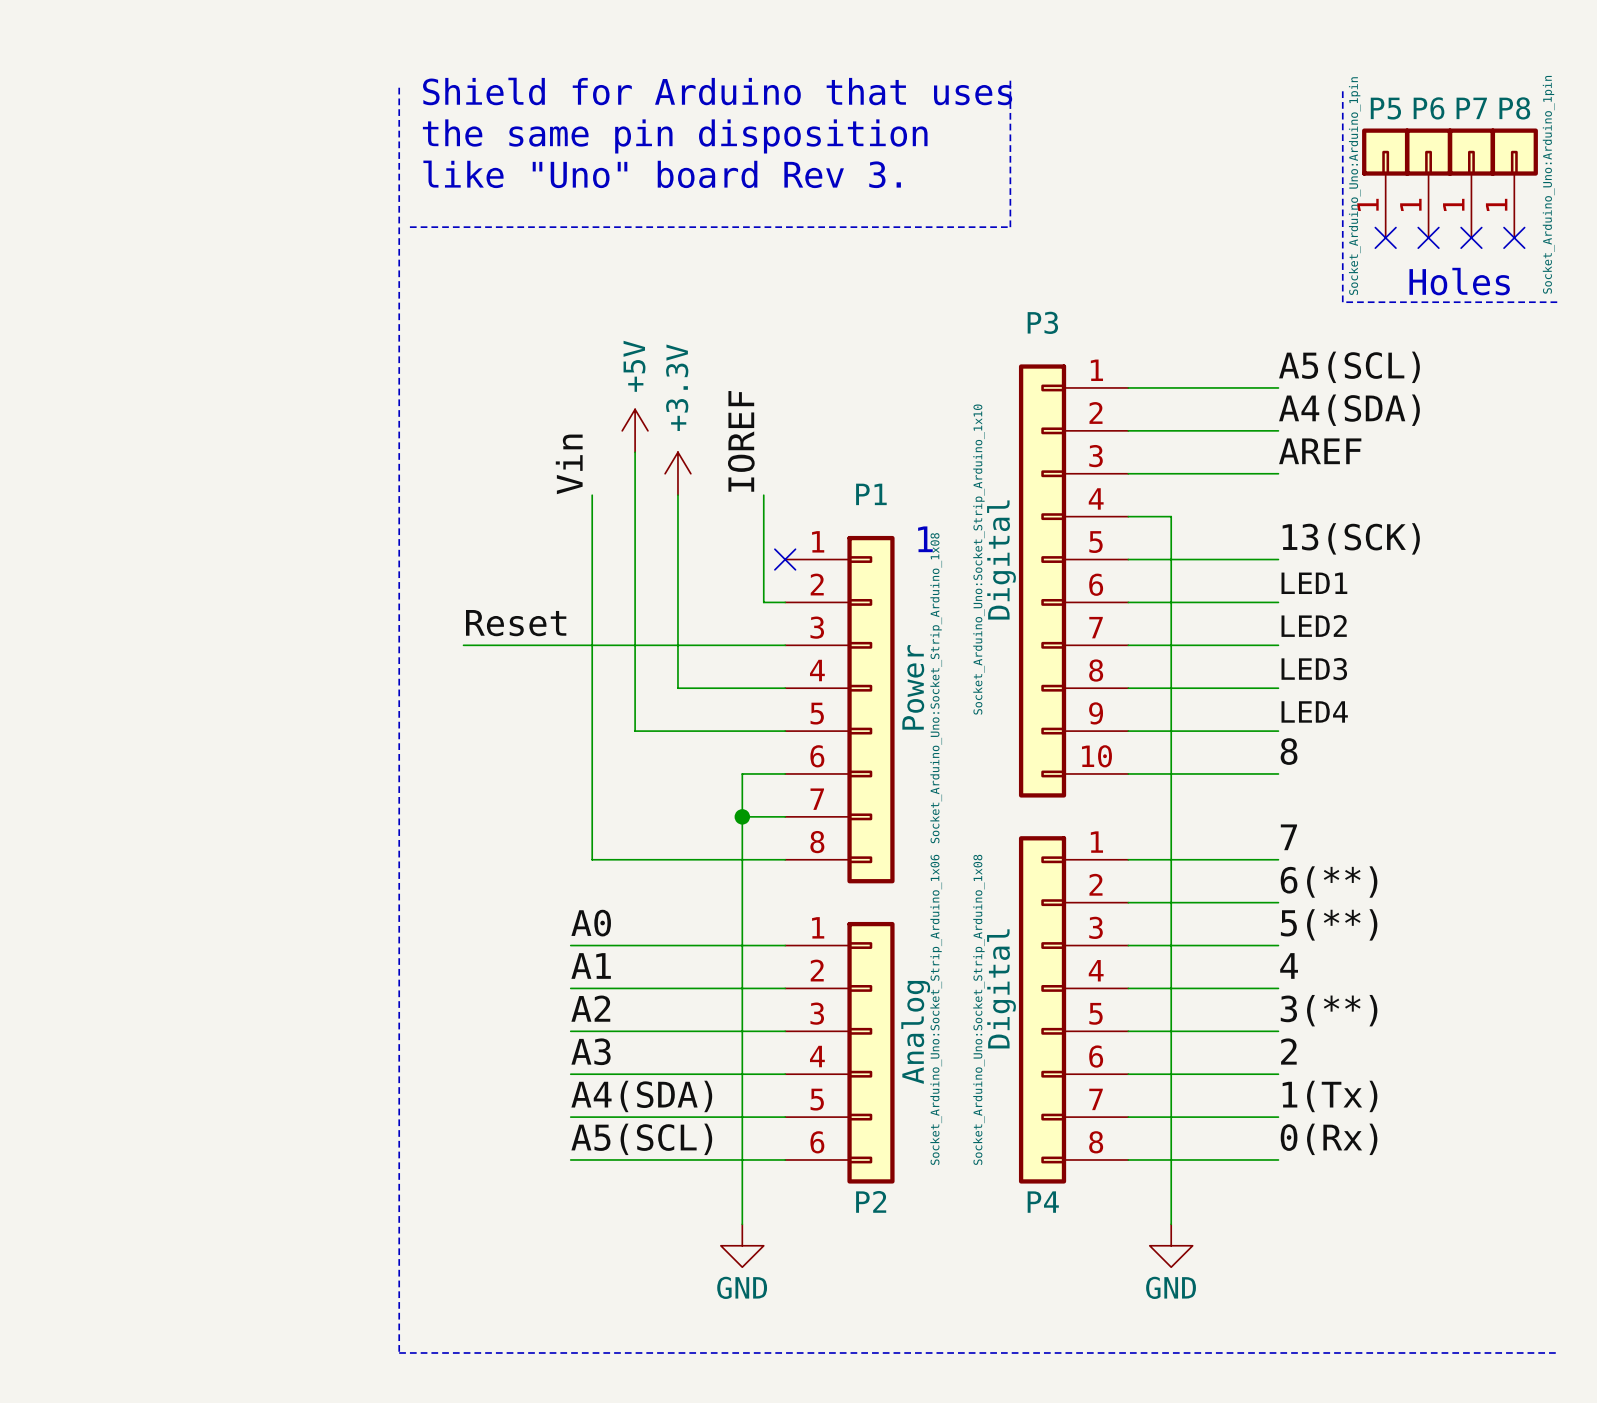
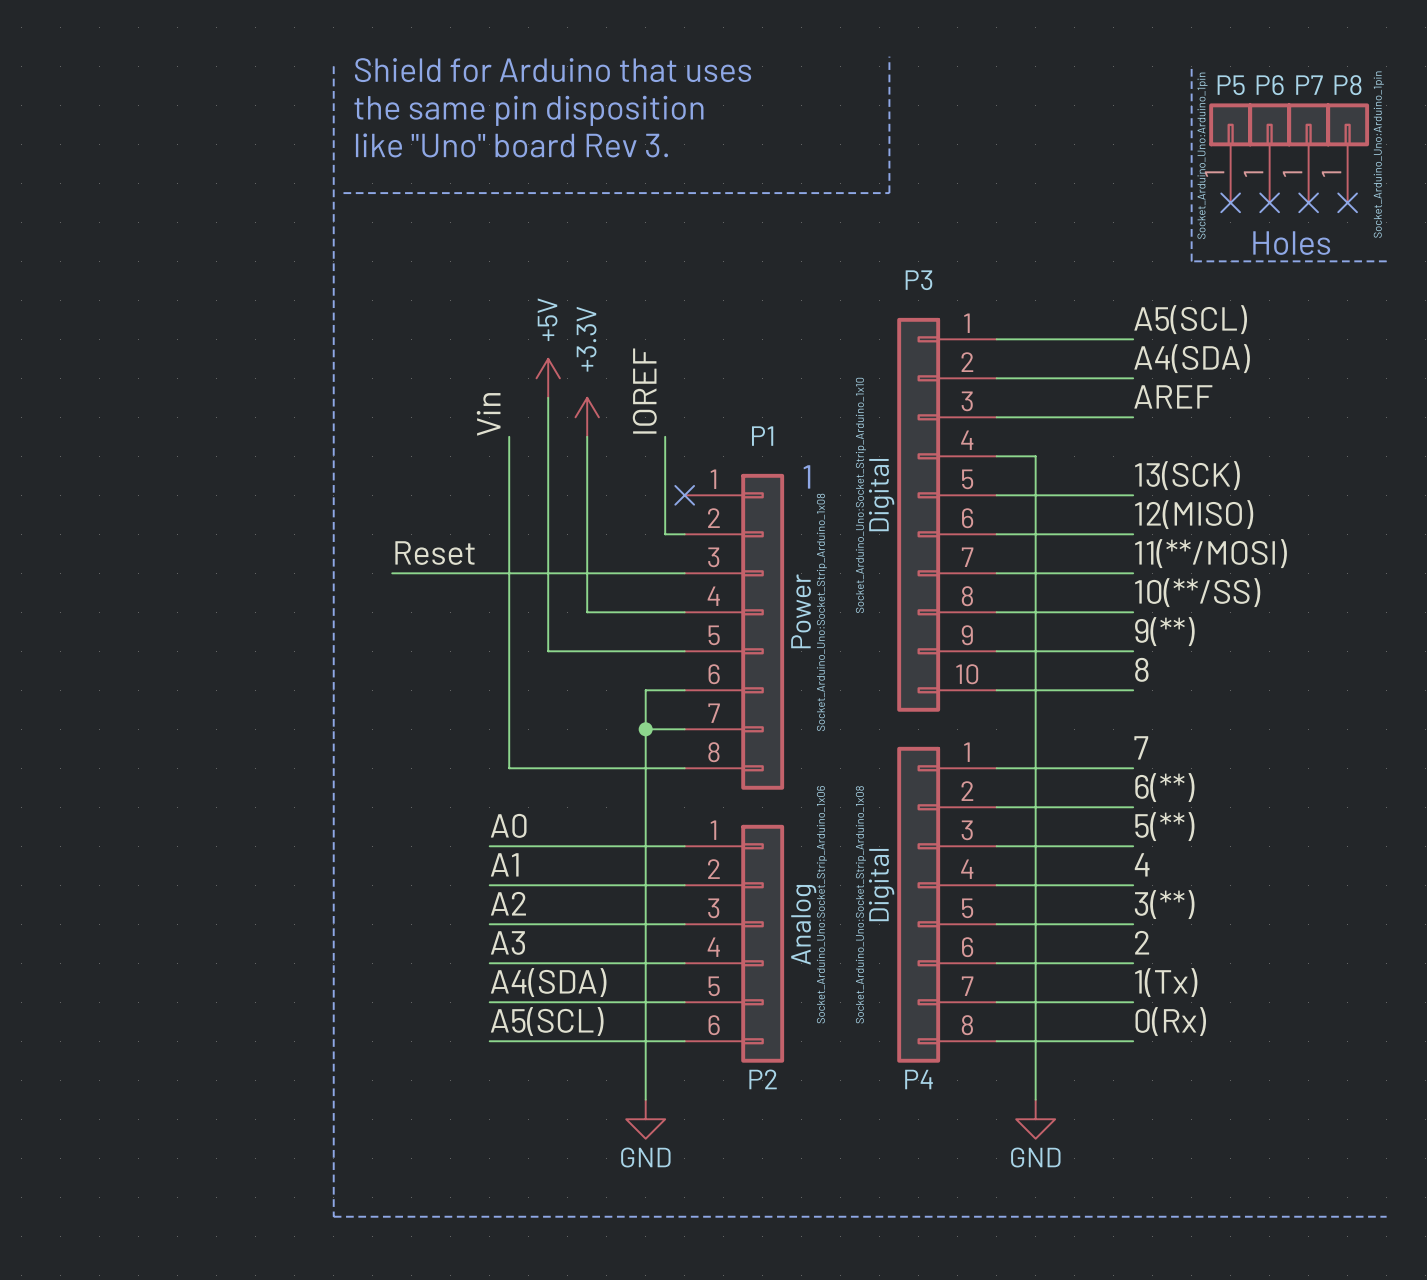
label: LED1 (1314, 583) -> 12(MISO) (1194, 514)
label: LED2 (1314, 625) -> 11(**/MOSI) (1210, 553)
label: LED3 (1314, 669) -> 10(**/SS) (1197, 592)
label: LED4 (1314, 711) -> 9(**) (1164, 631)

